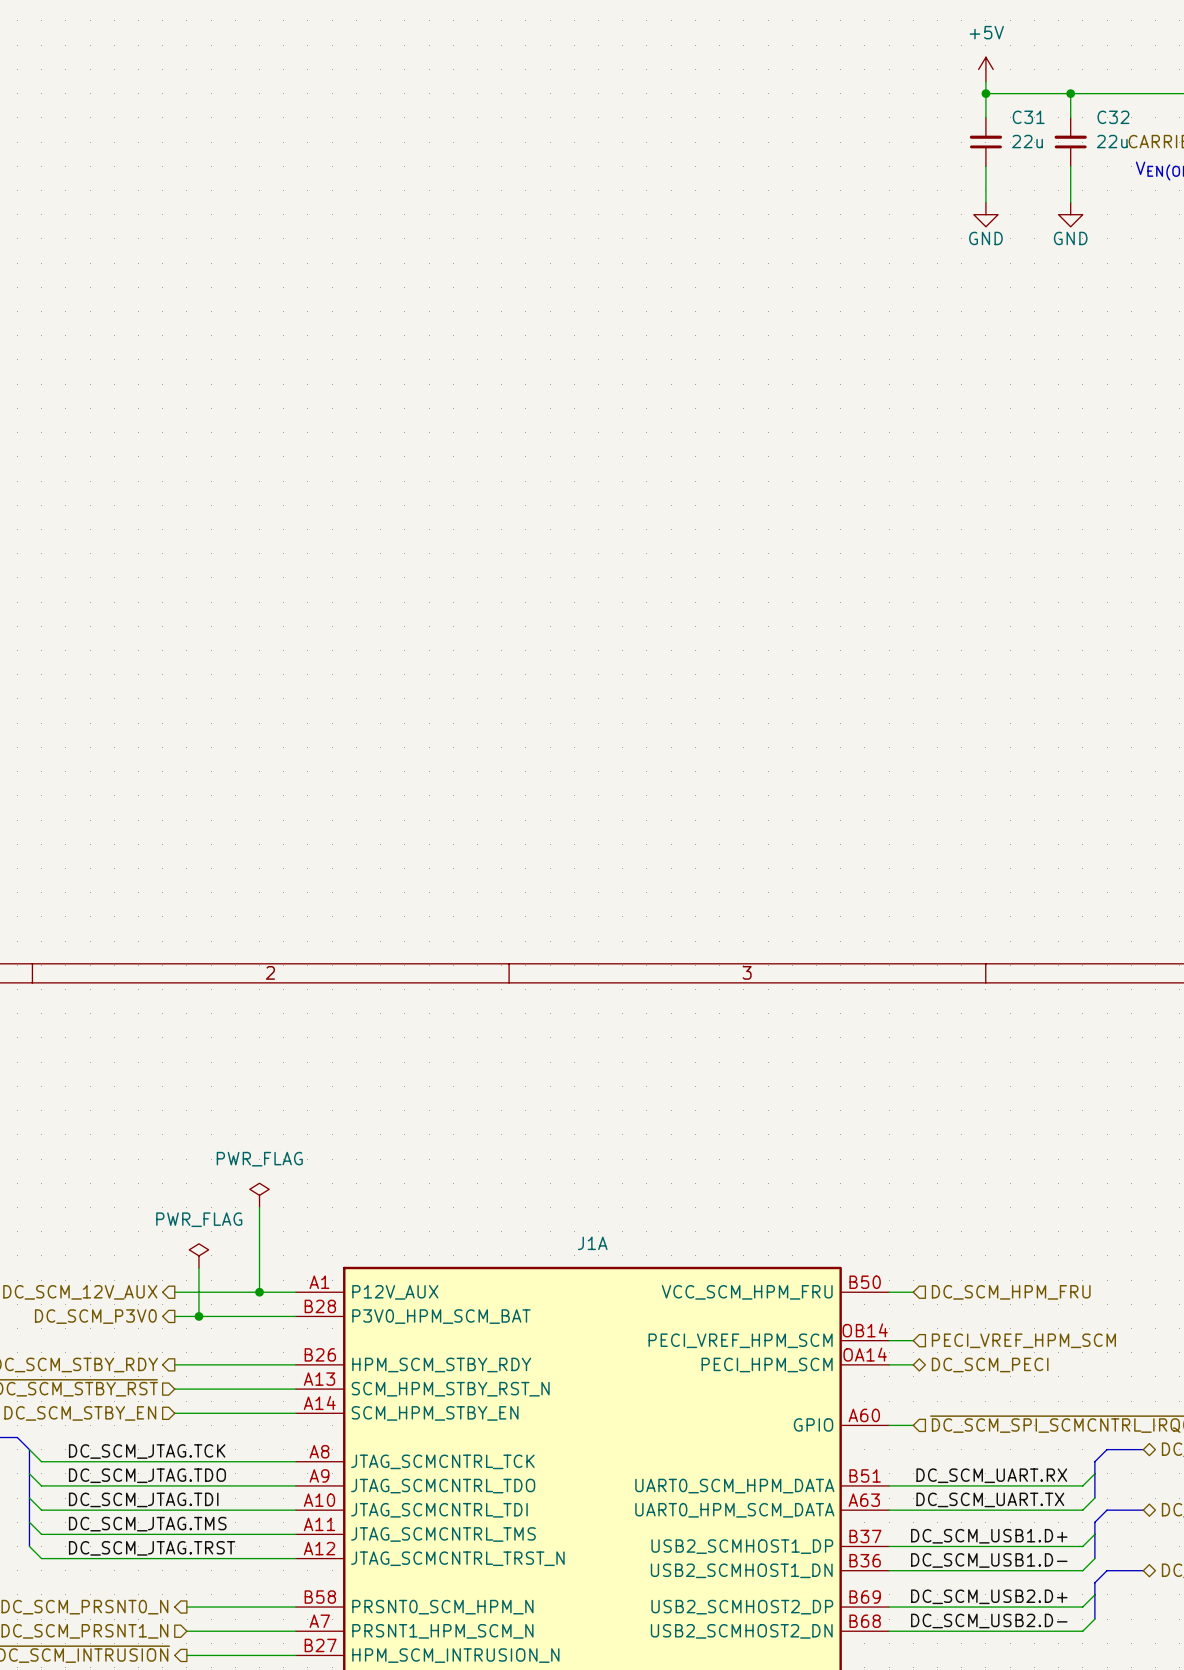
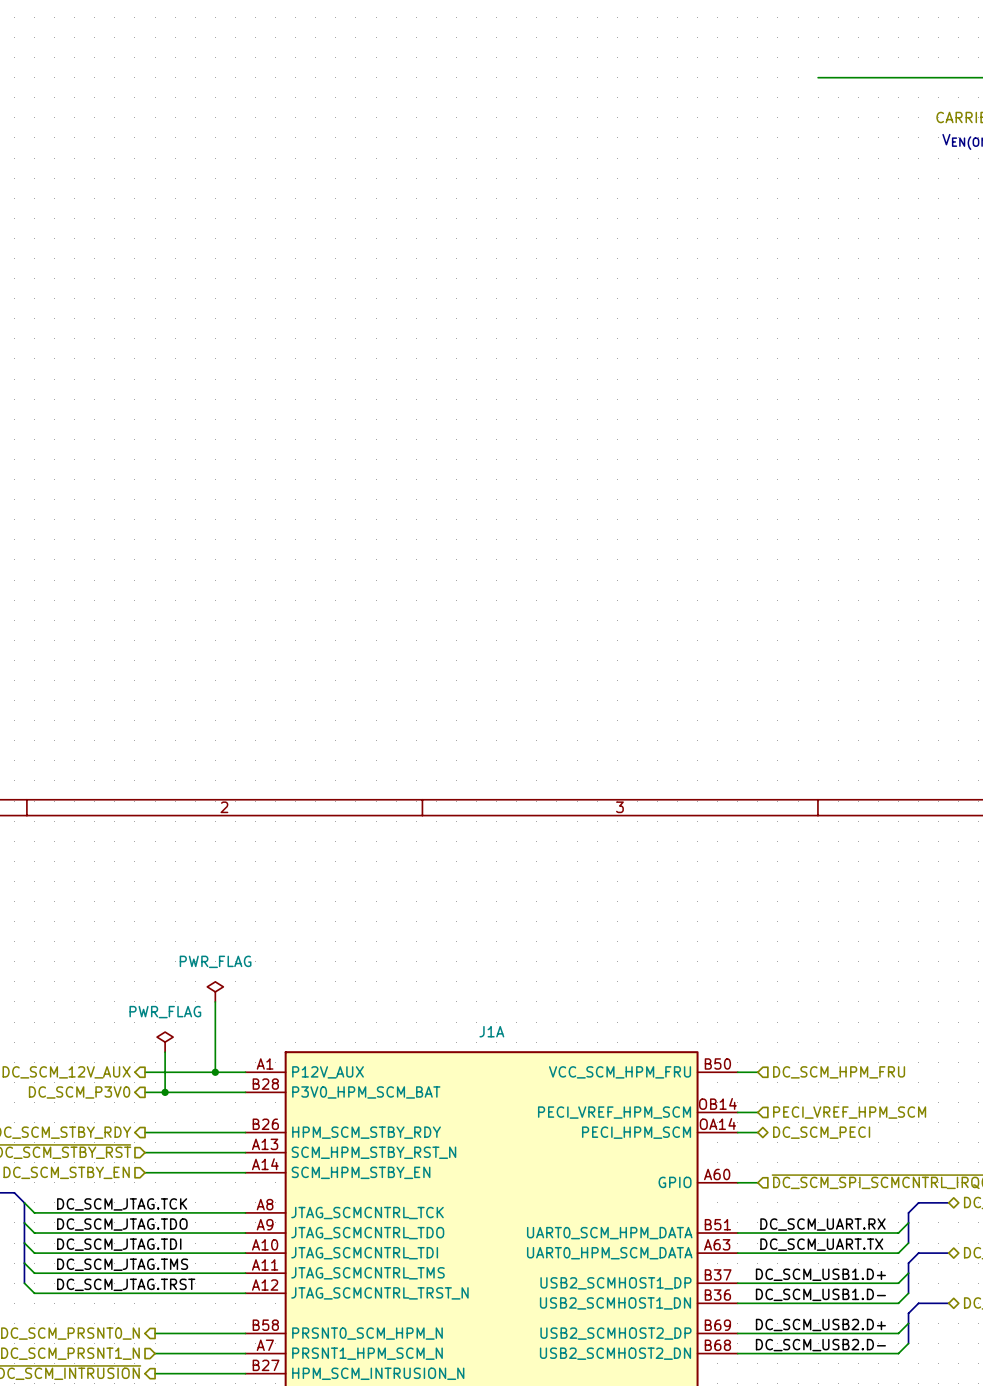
power symbol: +5V (985, 69) -> none
wire: (985, 81) (985, 117) -> none
junction: (985, 93) -> none
wire: (1070, 93) (1070, 117) -> none
junction: (1070, 93) -> none
C31: (985, 142) -> none
C32: (1070, 142) -> none
wire: (985, 166) (985, 202) -> none
wire: (1070, 166) (1070, 202) -> none
power symbol: GND (985, 214) -> none
power symbol: GND (1070, 214) -> none

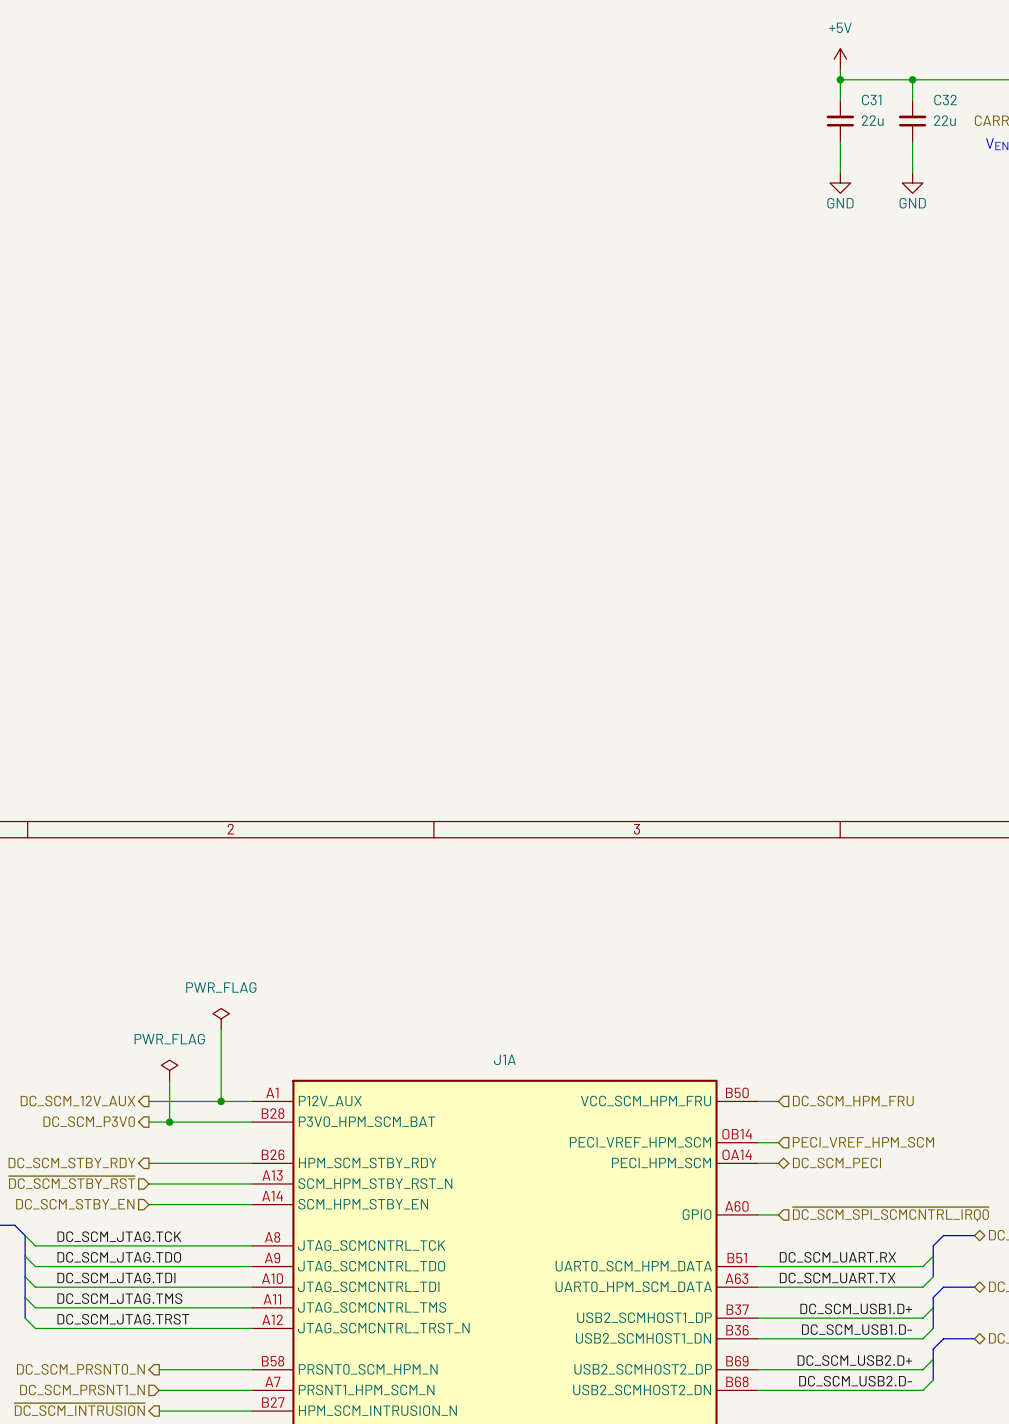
power symbol: none -> +5V (840, 59)
wire: none -> (840, 69) (840, 100)
junction: none -> (840, 79)
wire: none -> (912, 79) (912, 100)
junction: none -> (912, 79)
C31: none -> (840, 121)
C32: none -> (912, 121)
wire: none -> (840, 141) (840, 172)
wire: none -> (912, 141) (912, 172)
power symbol: none -> GND (840, 182)
power symbol: none -> GND (912, 182)

